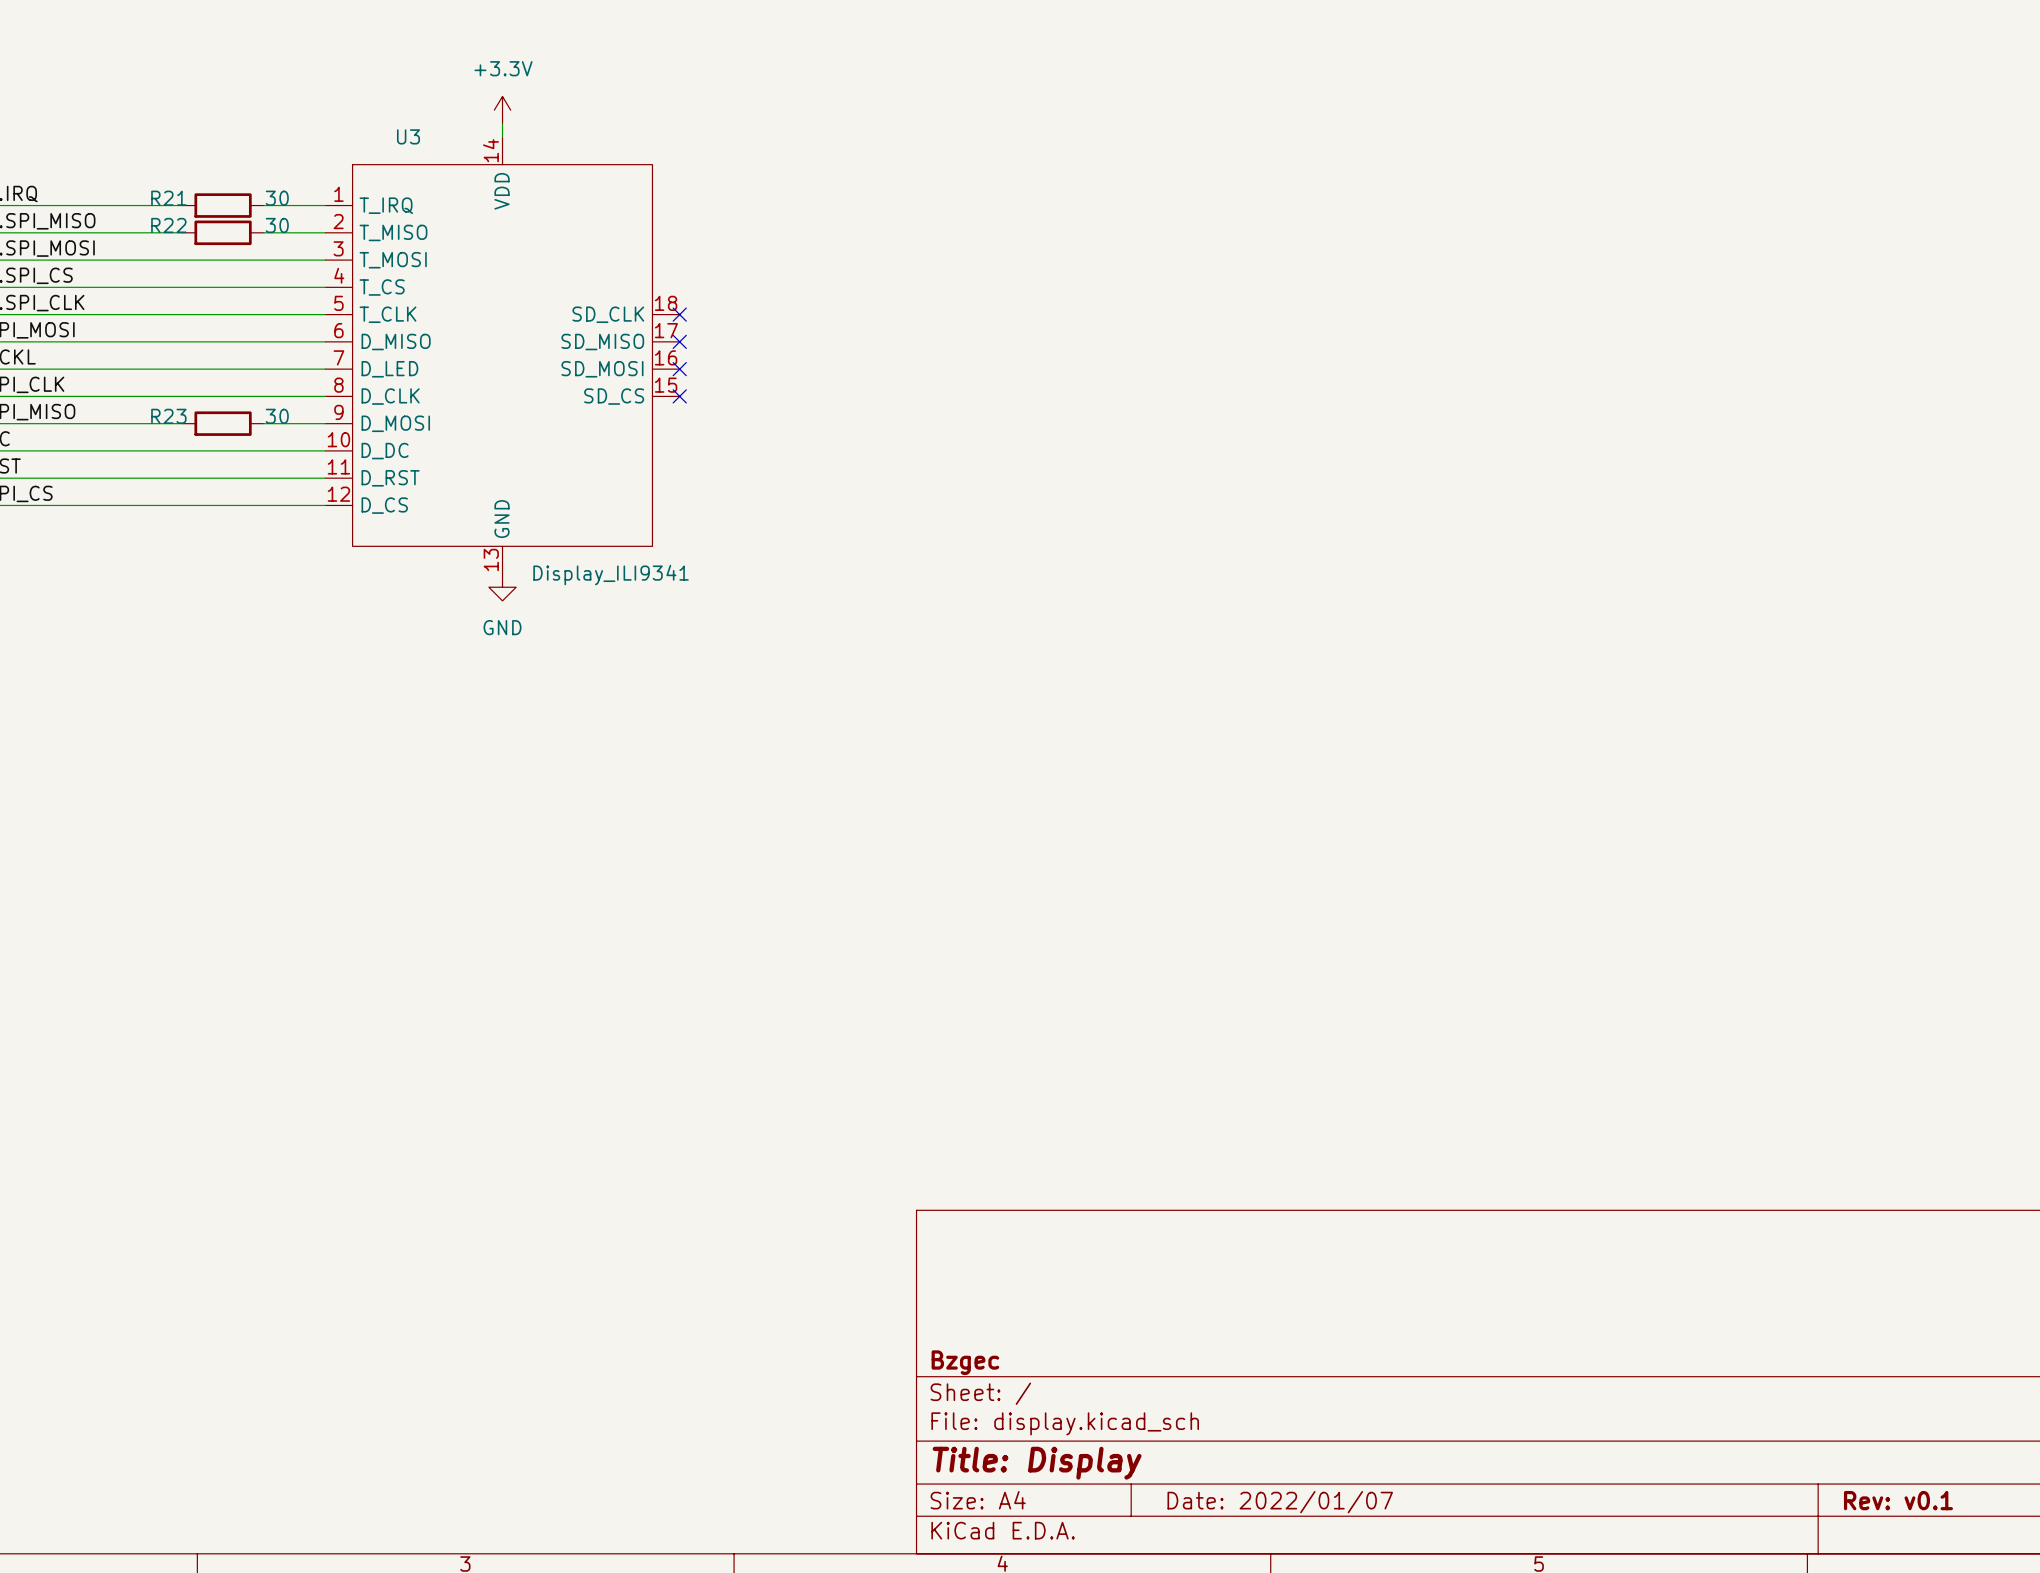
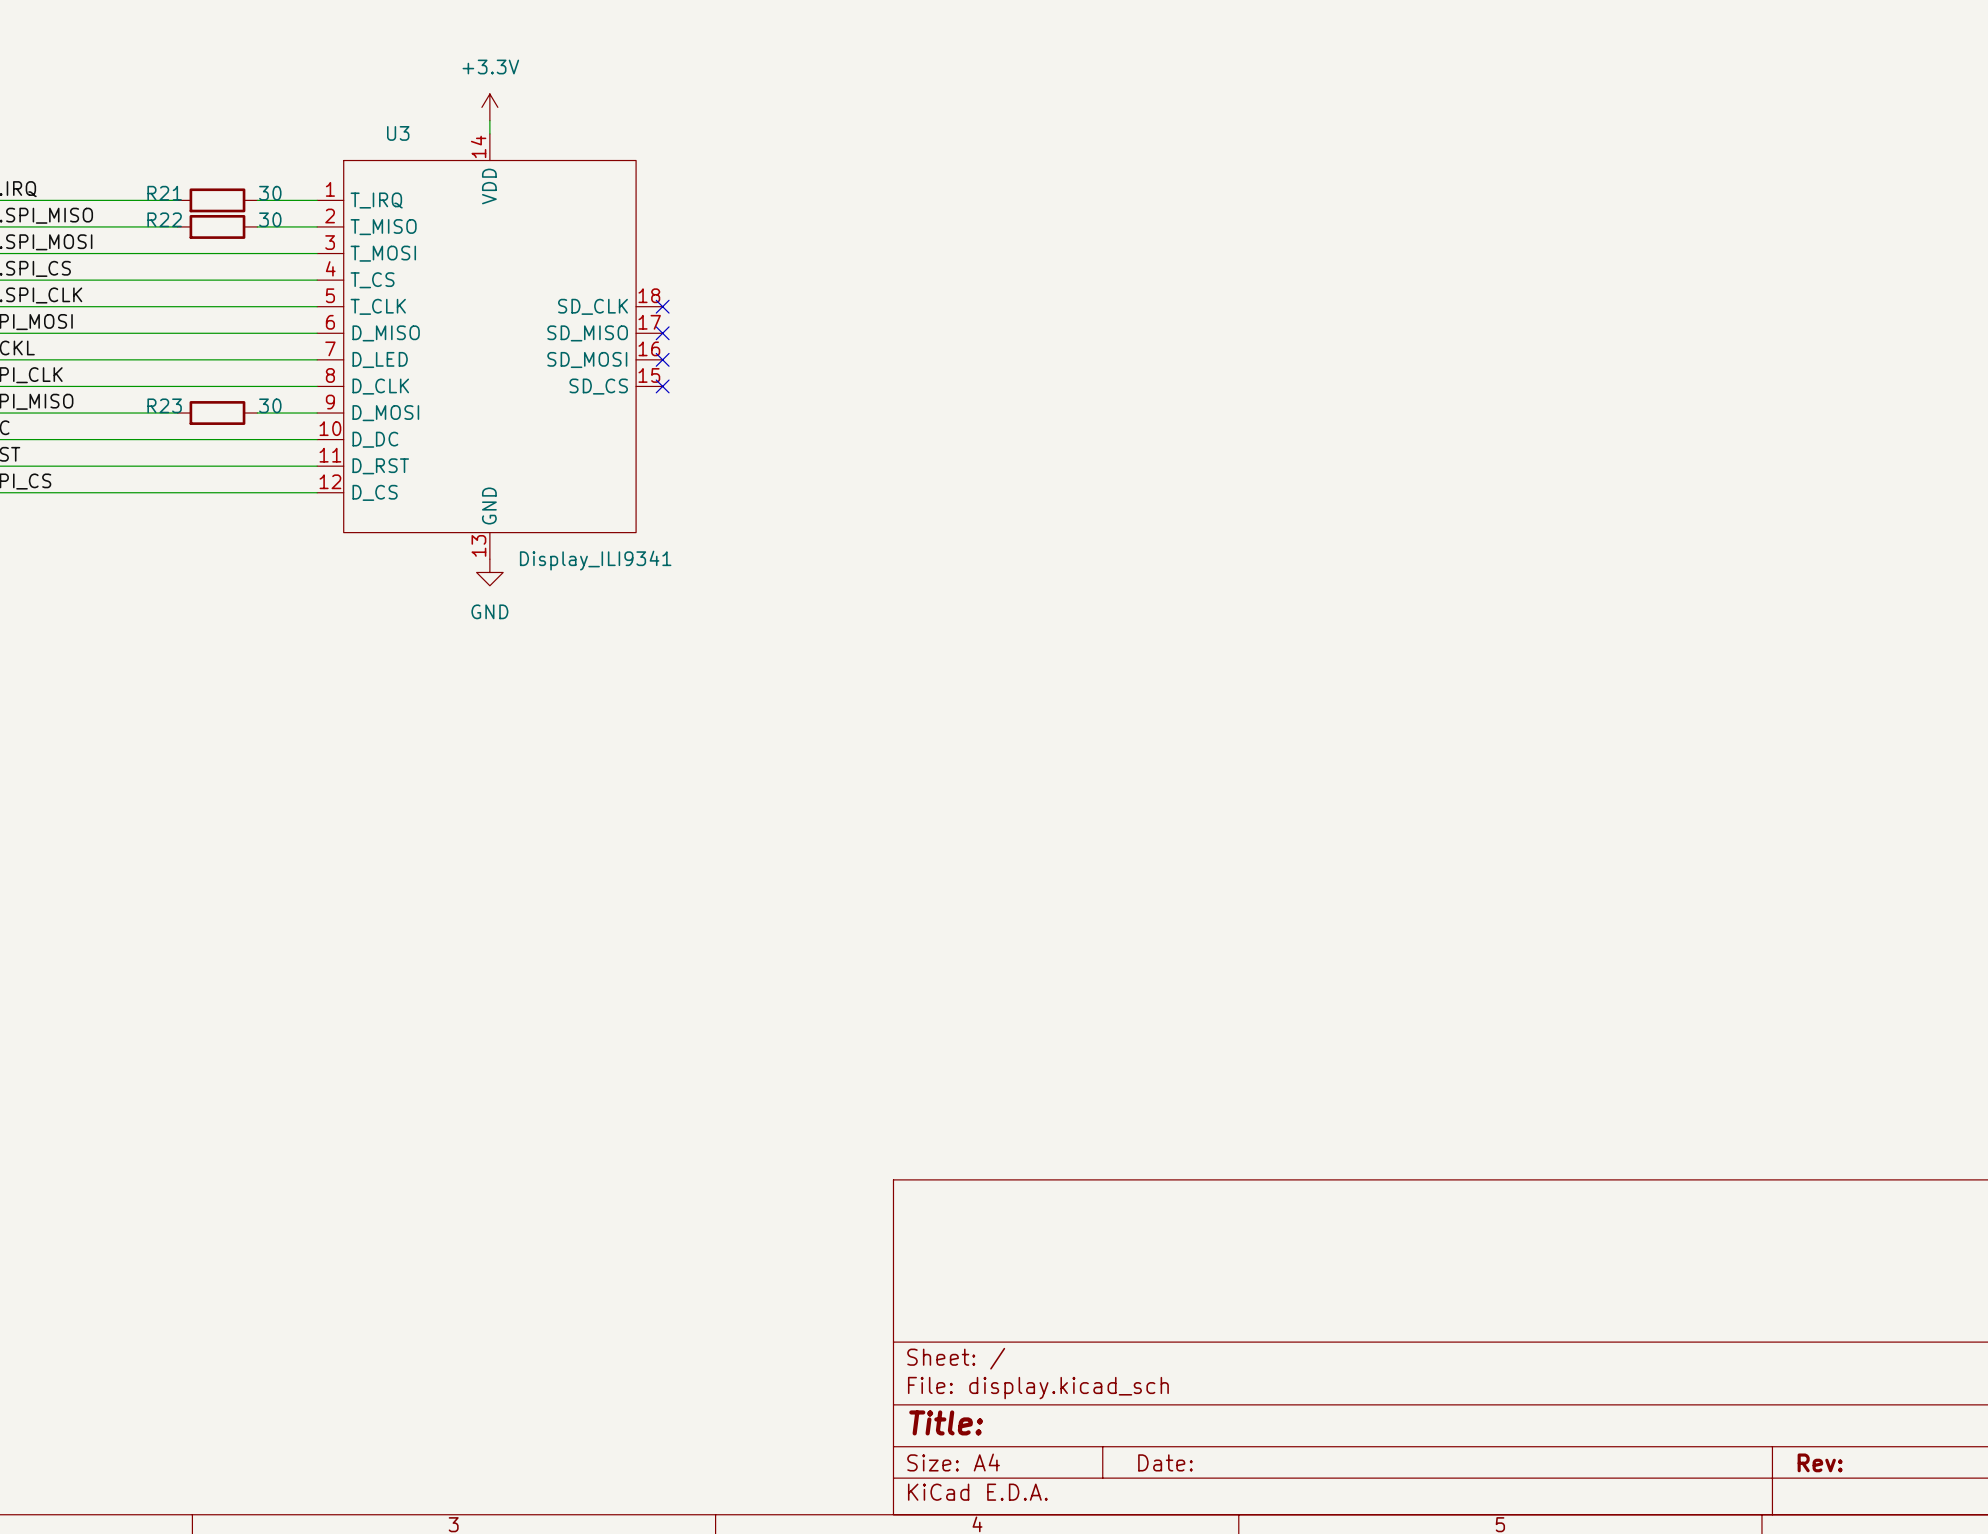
title block: Bzgec (965, 1362) -> none
title block: Title: Display (1037, 1463) -> Title: (946, 1422)
title block: Rev: v0.1 (1898, 1500) -> Rev: (1820, 1462)
title block: Date: 2022/01/07 (1280, 1502) -> Date: (1165, 1462)

